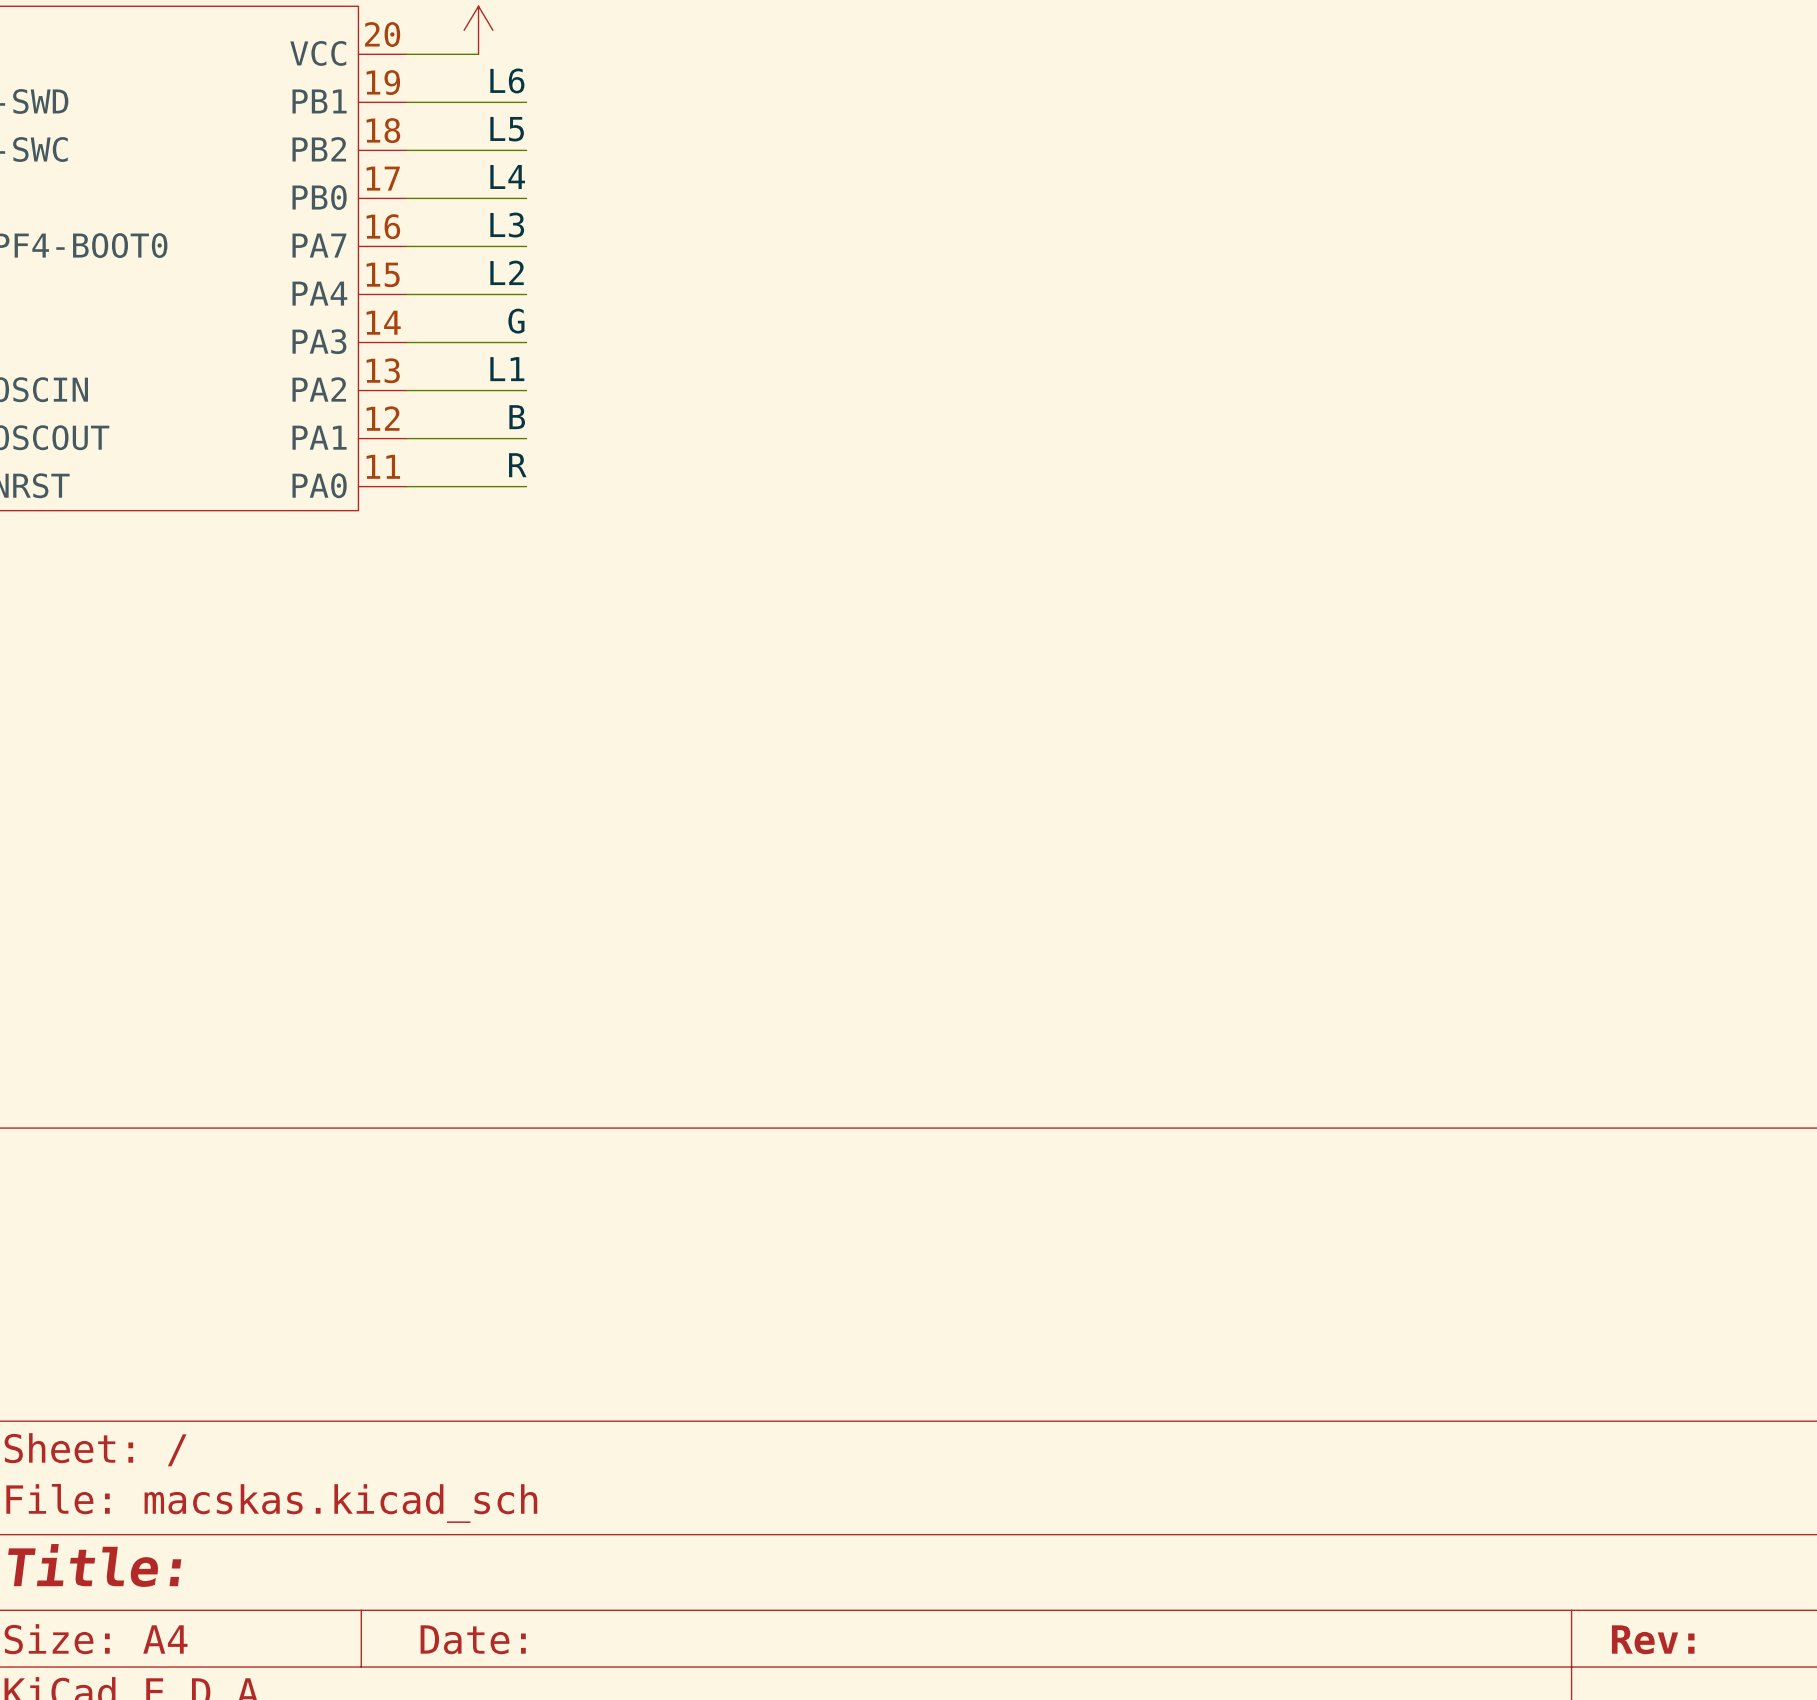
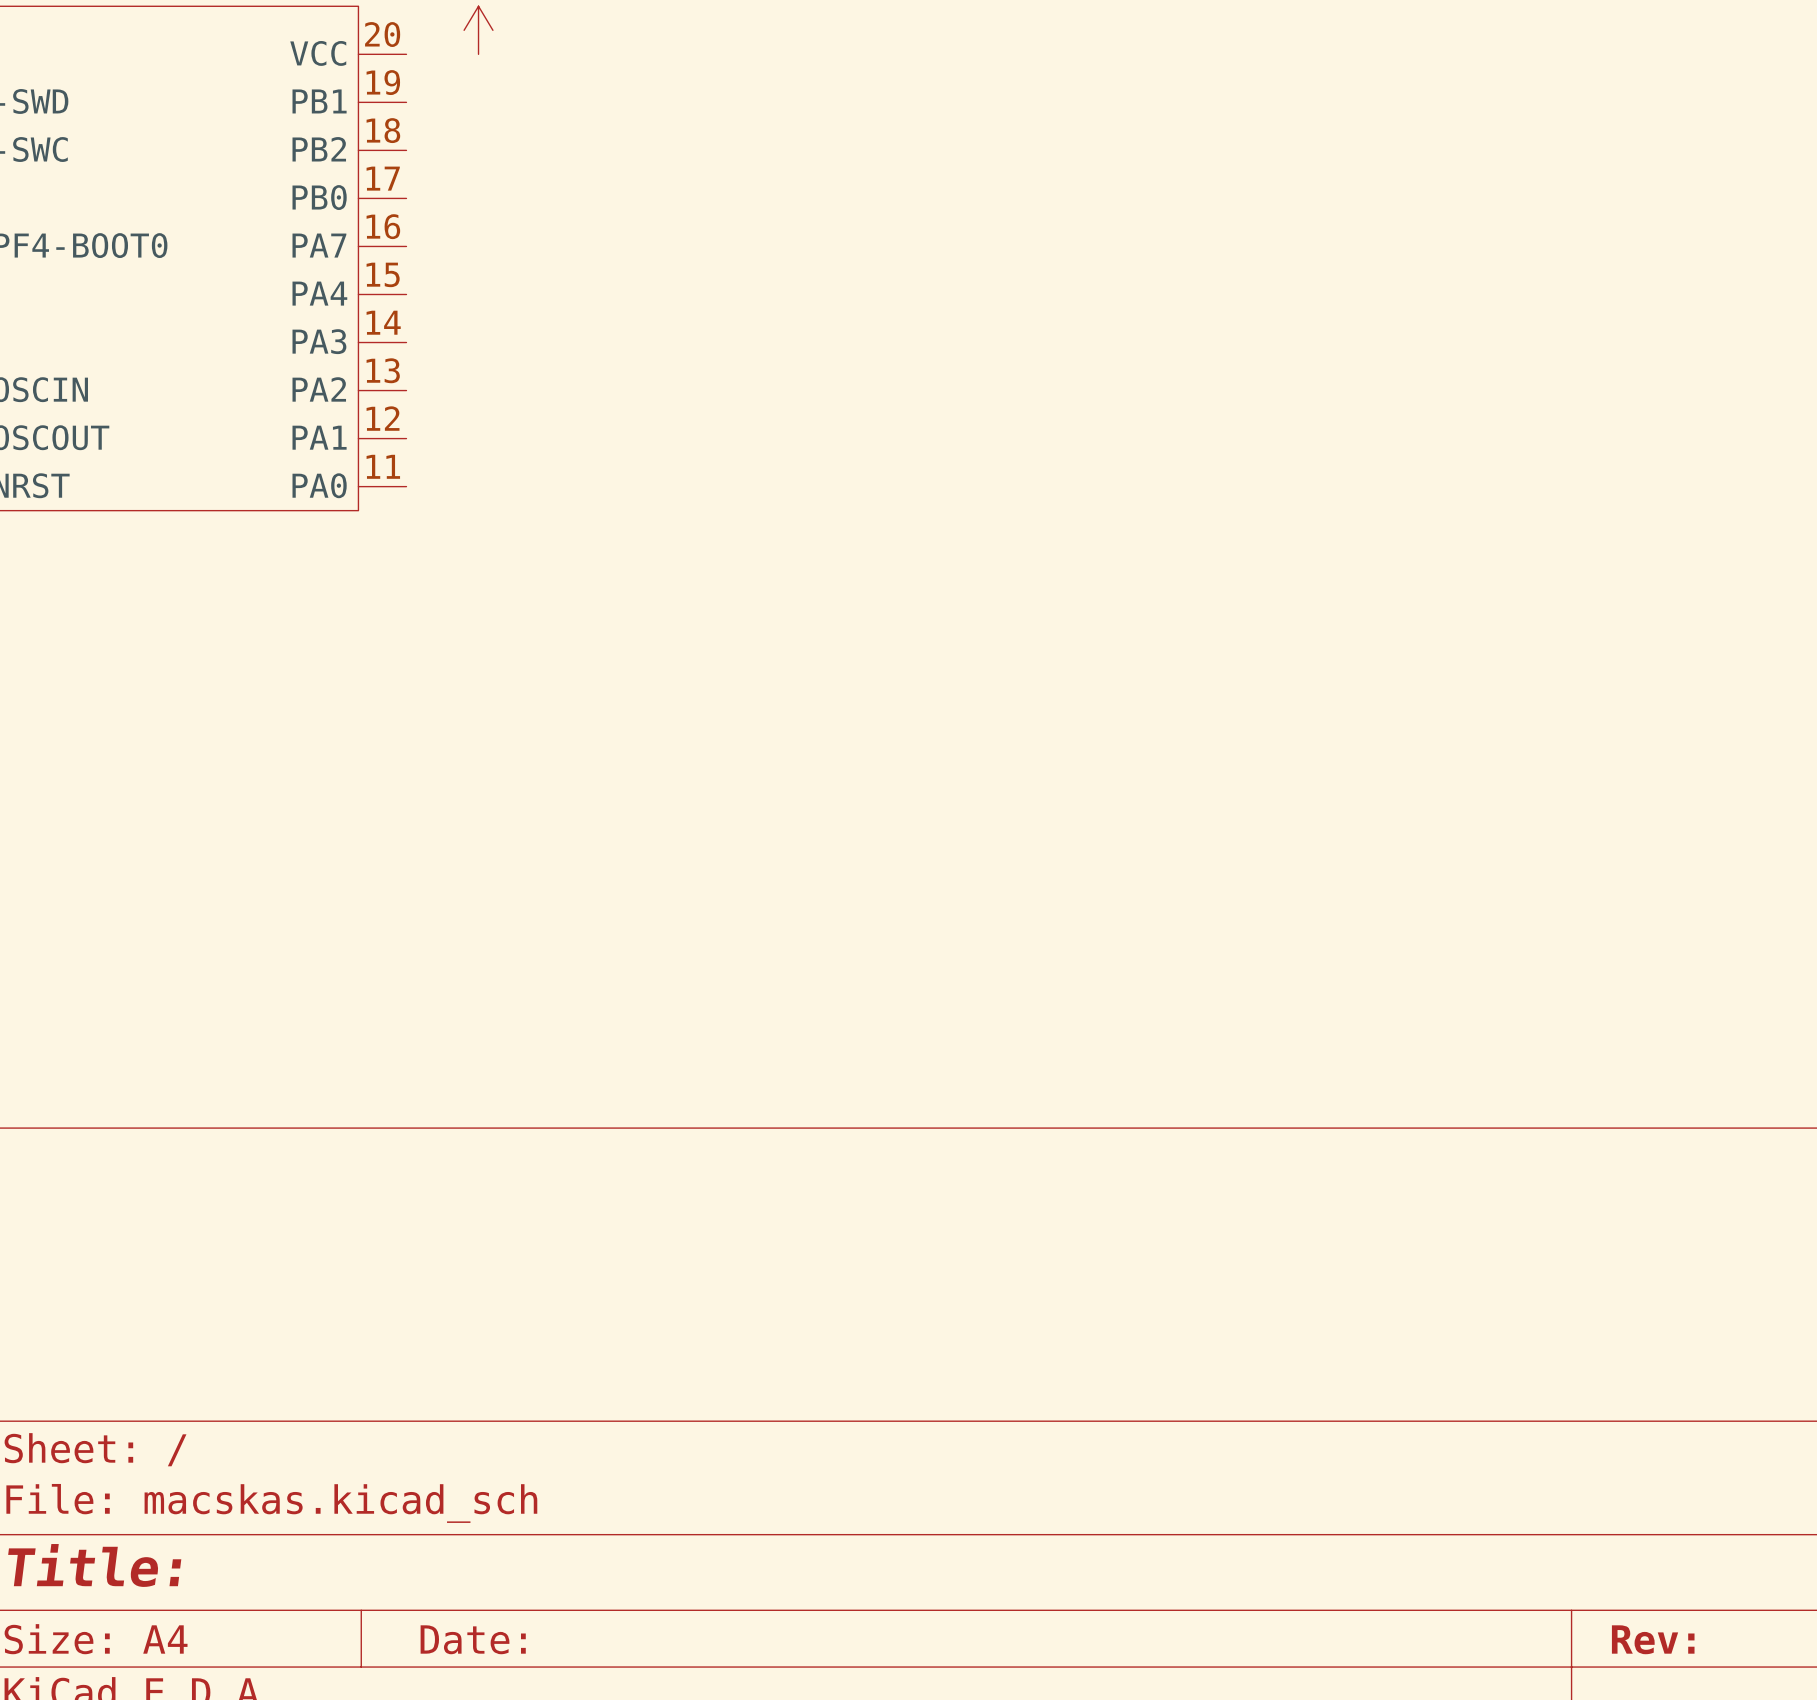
wire: (406, 54) (478, 54) -> none
label: L6 (507, 80) -> none
wire: (406, 102) (526, 102) -> none
label: L5 (507, 129) -> none
wire: (406, 150) (526, 150) -> none
label: L4 (507, 176) -> none
wire: (406, 198) (526, 198) -> none
label: L3 (507, 225) -> none
wire: (406, 246) (526, 246) -> none
label: L2 (507, 272) -> none
wire: (406, 294) (526, 294) -> none
label: G (516, 321) -> none
wire: (406, 342) (526, 342) -> none
label: L1 (507, 369) -> none
wire: (406, 390) (526, 390) -> none
label: B (517, 417) -> none
wire: (406, 438) (526, 438) -> none
label: R (517, 465) -> none
wire: (406, 486) (526, 486) -> none

